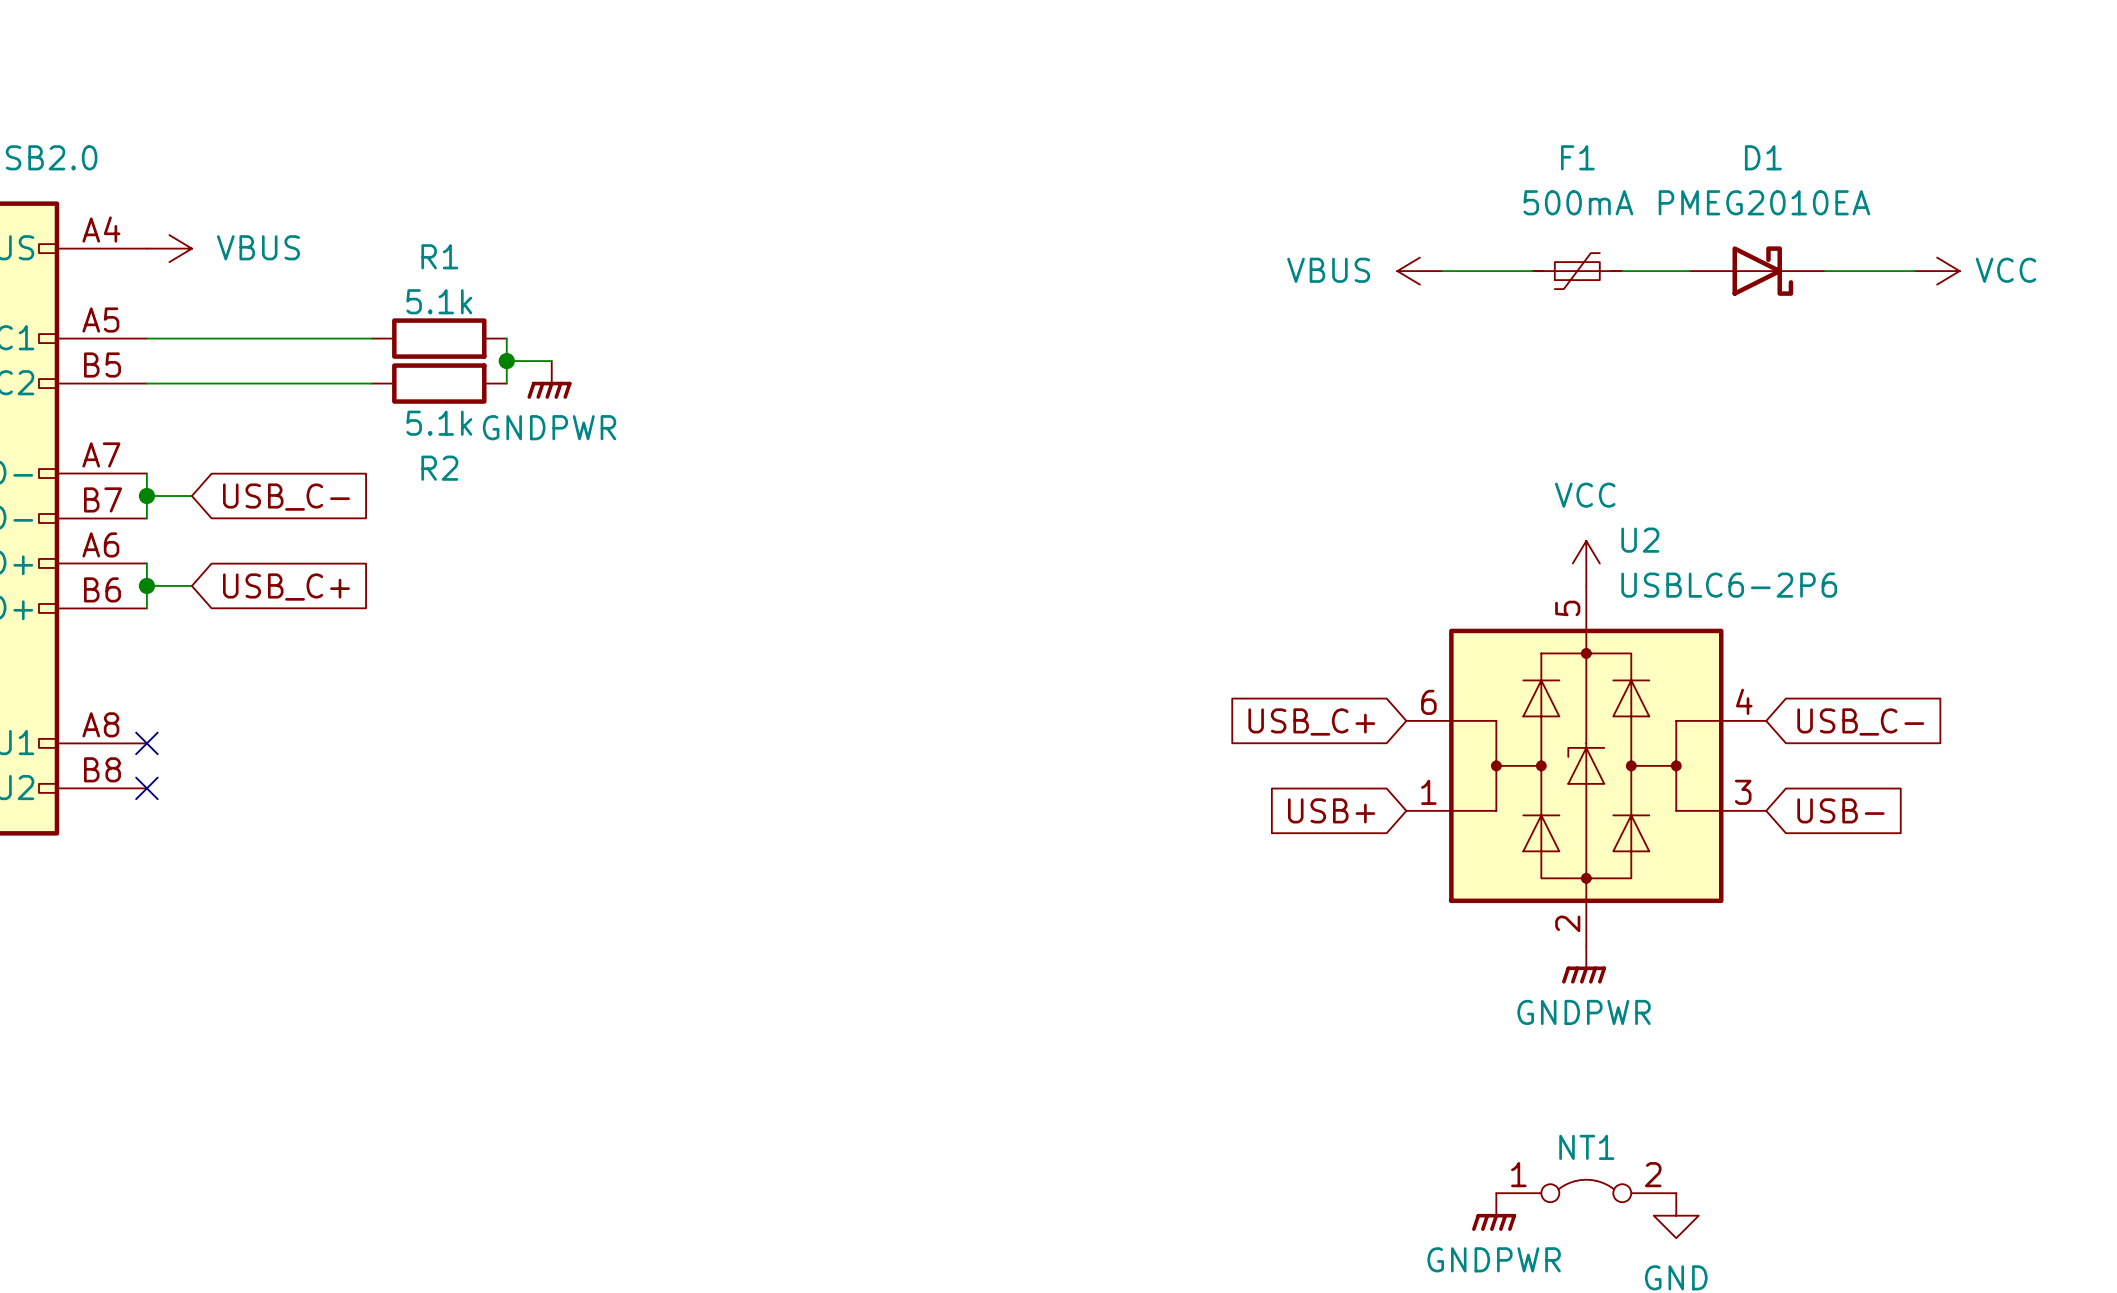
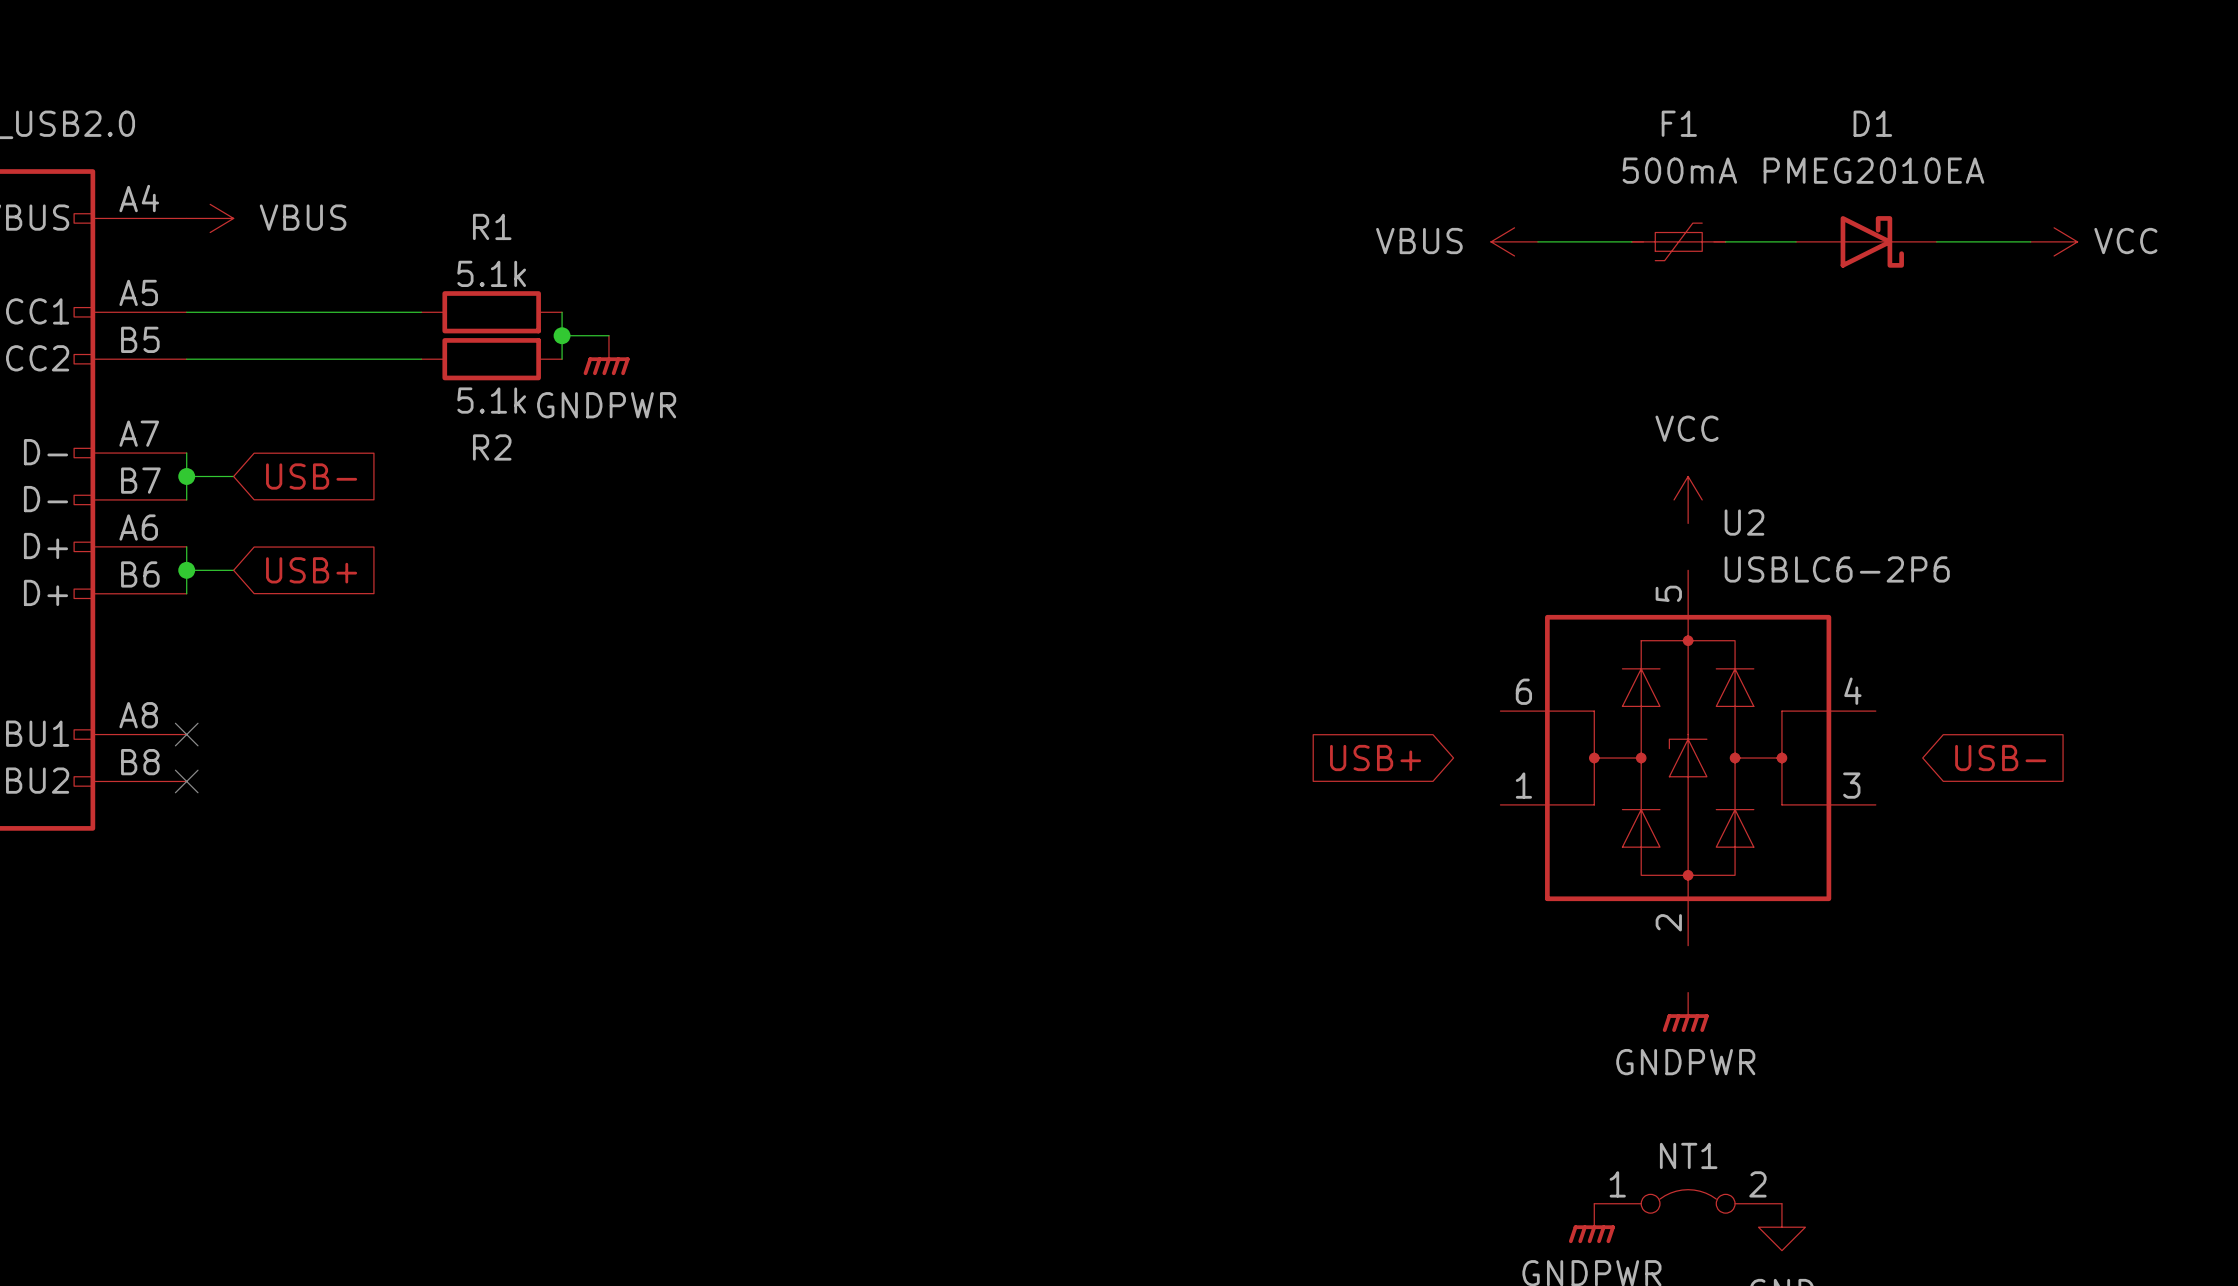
global label: USB_C- (286, 497) -> USB- (311, 476)
power symbol position: VCC (1586, 563) -> VCC (1688, 499)
global label: USB_C+ (286, 587) -> USB+ (311, 570)
global label: USB_C+ (1311, 721) -> none
global label: USB_C- (1860, 721) -> none
global label position: USB+ (1331, 810) -> USB+ (1375, 758)
global label position: USB- (1840, 810) -> USB- (2000, 758)
power symbol position: GNDPWR (1584, 964) -> GNDPWR (1685, 1012)

